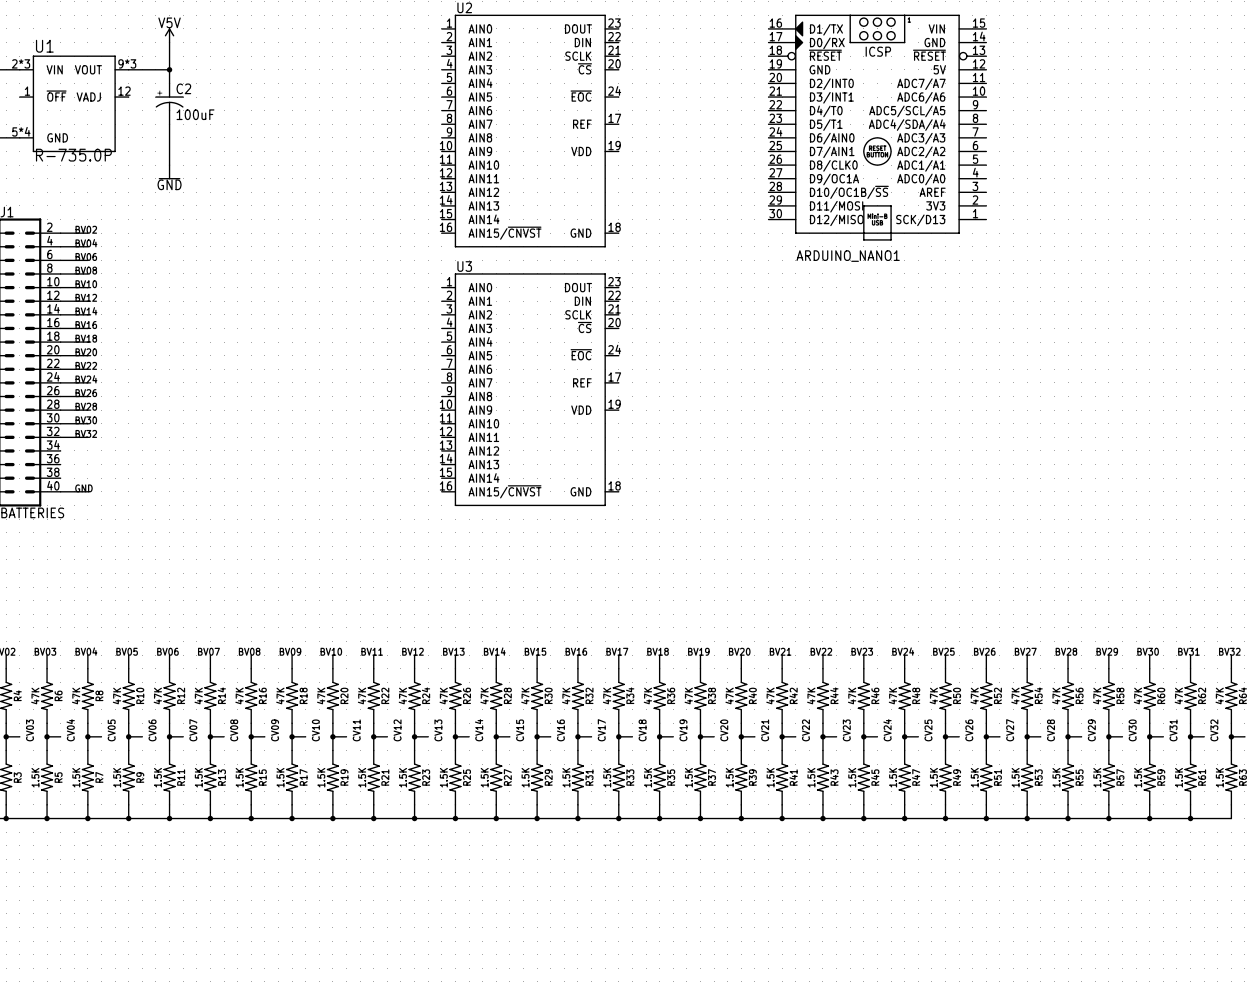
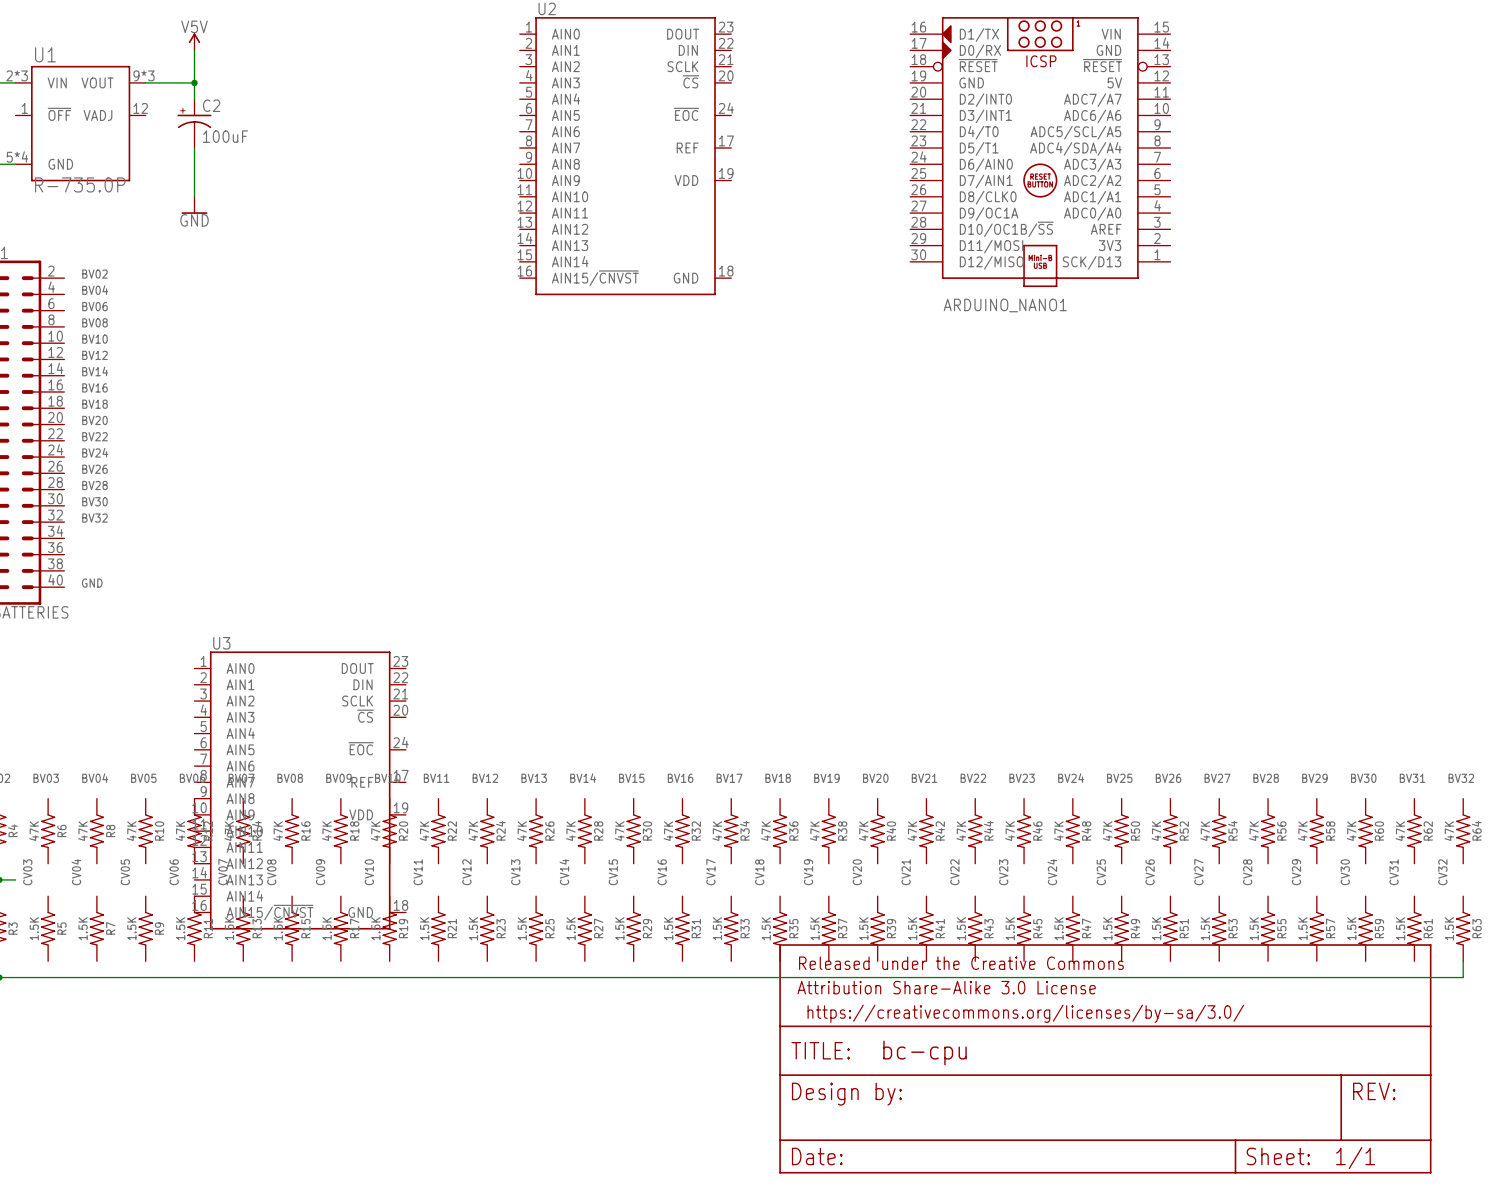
wire: (60, 233) (87, 233) -> none
wire: (60, 246) (87, 246) -> none
wire: (60, 260) (87, 260) -> none
wire: (60, 273) (87, 273) -> none
wire: (60, 287) (87, 287) -> none
wire: (60, 301) (87, 301) -> none
wire: (60, 314) (87, 314) -> none
wire: (60, 328) (87, 328) -> none
wire: (60, 342) (87, 342) -> none
wire: (60, 355) (87, 355) -> none
wire: (60, 369) (87, 369) -> none
wire: (60, 382) (87, 382) -> none
U3 position: (530, 389) -> (300, 790)
wire: (60, 396) (87, 396) -> none
wire: (60, 410) (87, 410) -> none
wire: (60, 423) (87, 423) -> none
wire: (60, 437) (87, 437) -> none
wire: (60, 491) (87, 491) -> none
wire: (47, 655) (47, 668) -> none
wire: (87, 655) (87, 668) -> none
wire: (128, 655) (128, 668) -> none
wire: (169, 655) (169, 668) -> none
wire: (210, 655) (210, 668) -> none
wire: (251, 655) (251, 668) -> none
wire: (292, 655) (292, 668) -> none
wire: (373, 655) (373, 668) -> none
wire: (414, 655) (414, 668) -> none
wire: (455, 655) (455, 668) -> none
wire: (496, 655) (496, 668) -> none
wire: (537, 655) (537, 668) -> none
wire: (577, 655) (577, 668) -> none
wire: (618, 655) (618, 668) -> none
wire: (659, 655) (659, 668) -> none
wire: (700, 655) (700, 668) -> none
wire: (741, 655) (741, 668) -> none
wire: (782, 655) (782, 668) -> none
wire: (822, 655) (822, 668) -> none
wire: (863, 655) (863, 668) -> none
wire: (904, 655) (904, 668) -> none
wire: (945, 655) (945, 668) -> none
wire: (986, 655) (986, 668) -> none
wire: (1027, 655) (1027, 668) -> none
wire: (1068, 655) (1068, 668) -> none
wire: (1108, 655) (1108, 668) -> none
wire: (1149, 655) (1149, 668) -> none
wire: (1190, 655) (1190, 668) -> none
wire: (1231, 655) (1231, 668) -> none
wire: (47, 723) (47, 750) -> none
wire: (87, 723) (87, 750) -> none
wire: (128, 723) (128, 750) -> none
wire: (210, 723) (210, 750) -> none
wire: (251, 723) (251, 750) -> none
wire: (292, 723) (292, 750) -> none
wire: (373, 723) (373, 750) -> none
wire: (414, 723) (414, 750) -> none
wire: (455, 723) (455, 750) -> none
wire: (496, 723) (496, 750) -> none
wire: (537, 723) (537, 750) -> none
wire: (577, 723) (577, 750) -> none
wire: (618, 723) (618, 750) -> none
wire: (659, 723) (659, 750) -> none
wire: (700, 723) (700, 750) -> none
wire: (741, 723) (741, 750) -> none
wire: (782, 723) (782, 750) -> none
wire: (822, 723) (822, 750) -> none
wire: (863, 723) (863, 750) -> none
wire: (904, 723) (904, 750) -> none
wire: (945, 723) (945, 750) -> none
wire: (986, 723) (986, 750) -> none
wire: (1027, 723) (1027, 750) -> none
wire: (1068, 723) (1068, 750) -> none
wire: (1108, 723) (1108, 750) -> none
wire: (1149, 723) (1149, 750) -> none
wire: (1190, 723) (1190, 750) -> none
wire: (1231, 723) (1231, 750) -> none
wire: (47, 736) (60, 736) -> none
junction: (47, 736) -> none
wire: (87, 736) (101, 736) -> none
junction: (87, 736) -> none
wire: (128, 736) (142, 736) -> none
junction: (128, 736) -> none
junction: (169, 736) -> none
wire: (210, 736) (224, 736) -> none
junction: (210, 736) -> none
wire: (251, 736) (264, 736) -> none
junction: (251, 736) -> none
wire: (292, 736) (305, 736) -> none
junction: (292, 736) -> none
wire: (332, 736) (346, 736) -> none
junction: (332, 736) -> none
wire: (373, 736) (387, 736) -> none
junction: (373, 736) -> none
wire: (414, 736) (428, 736) -> none
junction: (414, 736) -> none
wire: (455, 736) (469, 736) -> none
junction: (455, 736) -> none
wire: (496, 736) (509, 736) -> none
junction: (496, 736) -> none
wire: (537, 736) (550, 736) -> none
junction: (537, 736) -> none
wire: (577, 736) (591, 736) -> none
junction: (577, 736) -> none
wire: (618, 736) (632, 736) -> none
junction: (618, 736) -> none
wire: (659, 736) (673, 736) -> none
junction: (659, 736) -> none
wire: (700, 736) (714, 736) -> none
junction: (700, 736) -> none
wire: (741, 736) (754, 736) -> none
junction: (741, 736) -> none
wire: (782, 736) (795, 736) -> none
junction: (782, 736) -> none
wire: (822, 736) (836, 736) -> none
junction: (822, 736) -> none
wire: (863, 736) (877, 736) -> none
junction: (863, 736) -> none
wire: (904, 736) (918, 736) -> none
junction: (904, 736) -> none
wire: (945, 736) (959, 736) -> none
junction: (945, 736) -> none
wire: (986, 736) (999, 736) -> none
junction: (986, 736) -> none
wire: (1027, 736) (1040, 736) -> none
junction: (1027, 736) -> none
wire: (1068, 736) (1081, 736) -> none
junction: (1068, 736) -> none
wire: (1108, 736) (1122, 736) -> none
junction: (1108, 736) -> none
wire: (1149, 736) (1163, 736) -> none
junction: (1149, 736) -> none
wire: (1190, 736) (1204, 736) -> none
junction: (1190, 736) -> none
wire: (1231, 736) (1244, 736) -> none
junction: (1231, 736) -> none
wire: (47, 804) (47, 818) -> none
wire: (87, 804) (87, 818) -> none
wire: (128, 804) (128, 818) -> none
wire: (169, 804) (169, 818) -> none
wire: (210, 804) (210, 818) -> none
wire: (251, 804) (251, 818) -> none
wire: (292, 804) (292, 818) -> none
wire: (332, 804) (332, 818) -> none
wire: (373, 804) (373, 818) -> none
wire: (414, 804) (414, 818) -> none
wire: (455, 804) (455, 818) -> none
wire: (496, 804) (496, 818) -> none
wire: (537, 804) (537, 818) -> none
wire: (577, 804) (577, 818) -> none
wire: (618, 804) (618, 818) -> none
wire: (700, 804) (700, 818) -> none
wire: (741, 804) (741, 818) -> none
wire: (782, 804) (782, 818) -> none
wire: (822, 804) (822, 818) -> none
wire: (863, 804) (863, 818) -> none
wire: (904, 804) (904, 818) -> none
wire: (945, 804) (945, 818) -> none
wire: (986, 804) (986, 818) -> none
wire: (1027, 804) (1027, 818) -> none
wire: (1068, 804) (1068, 818) -> none
wire: (1108, 804) (1108, 818) -> none
wire: (1149, 804) (1149, 818) -> none
wire: (1190, 804) (1190, 818) -> none
junction: (47, 818) -> none
junction: (87, 818) -> none
junction: (128, 818) -> none
junction: (169, 818) -> none
junction: (210, 818) -> none
junction: (251, 818) -> none
junction: (292, 818) -> none
junction: (332, 818) -> none
junction: (373, 818) -> none
junction: (414, 818) -> none
junction: (455, 818) -> none
junction: (496, 818) -> none
junction: (537, 818) -> none
junction: (577, 818) -> none
junction: (618, 818) -> none
junction: (659, 818) -> none
junction: (700, 818) -> none
junction: (741, 818) -> none
junction: (782, 818) -> none
junction: (822, 818) -> none
junction: (863, 818) -> none
junction: (904, 818) -> none
junction: (945, 818) -> none
junction: (986, 818) -> none
junction: (1027, 818) -> none
junction: (1068, 818) -> none
junction: (1108, 818) -> none
junction: (1149, 818) -> none
junction: (1190, 818) -> none
part: none -> (1105, 1058)

